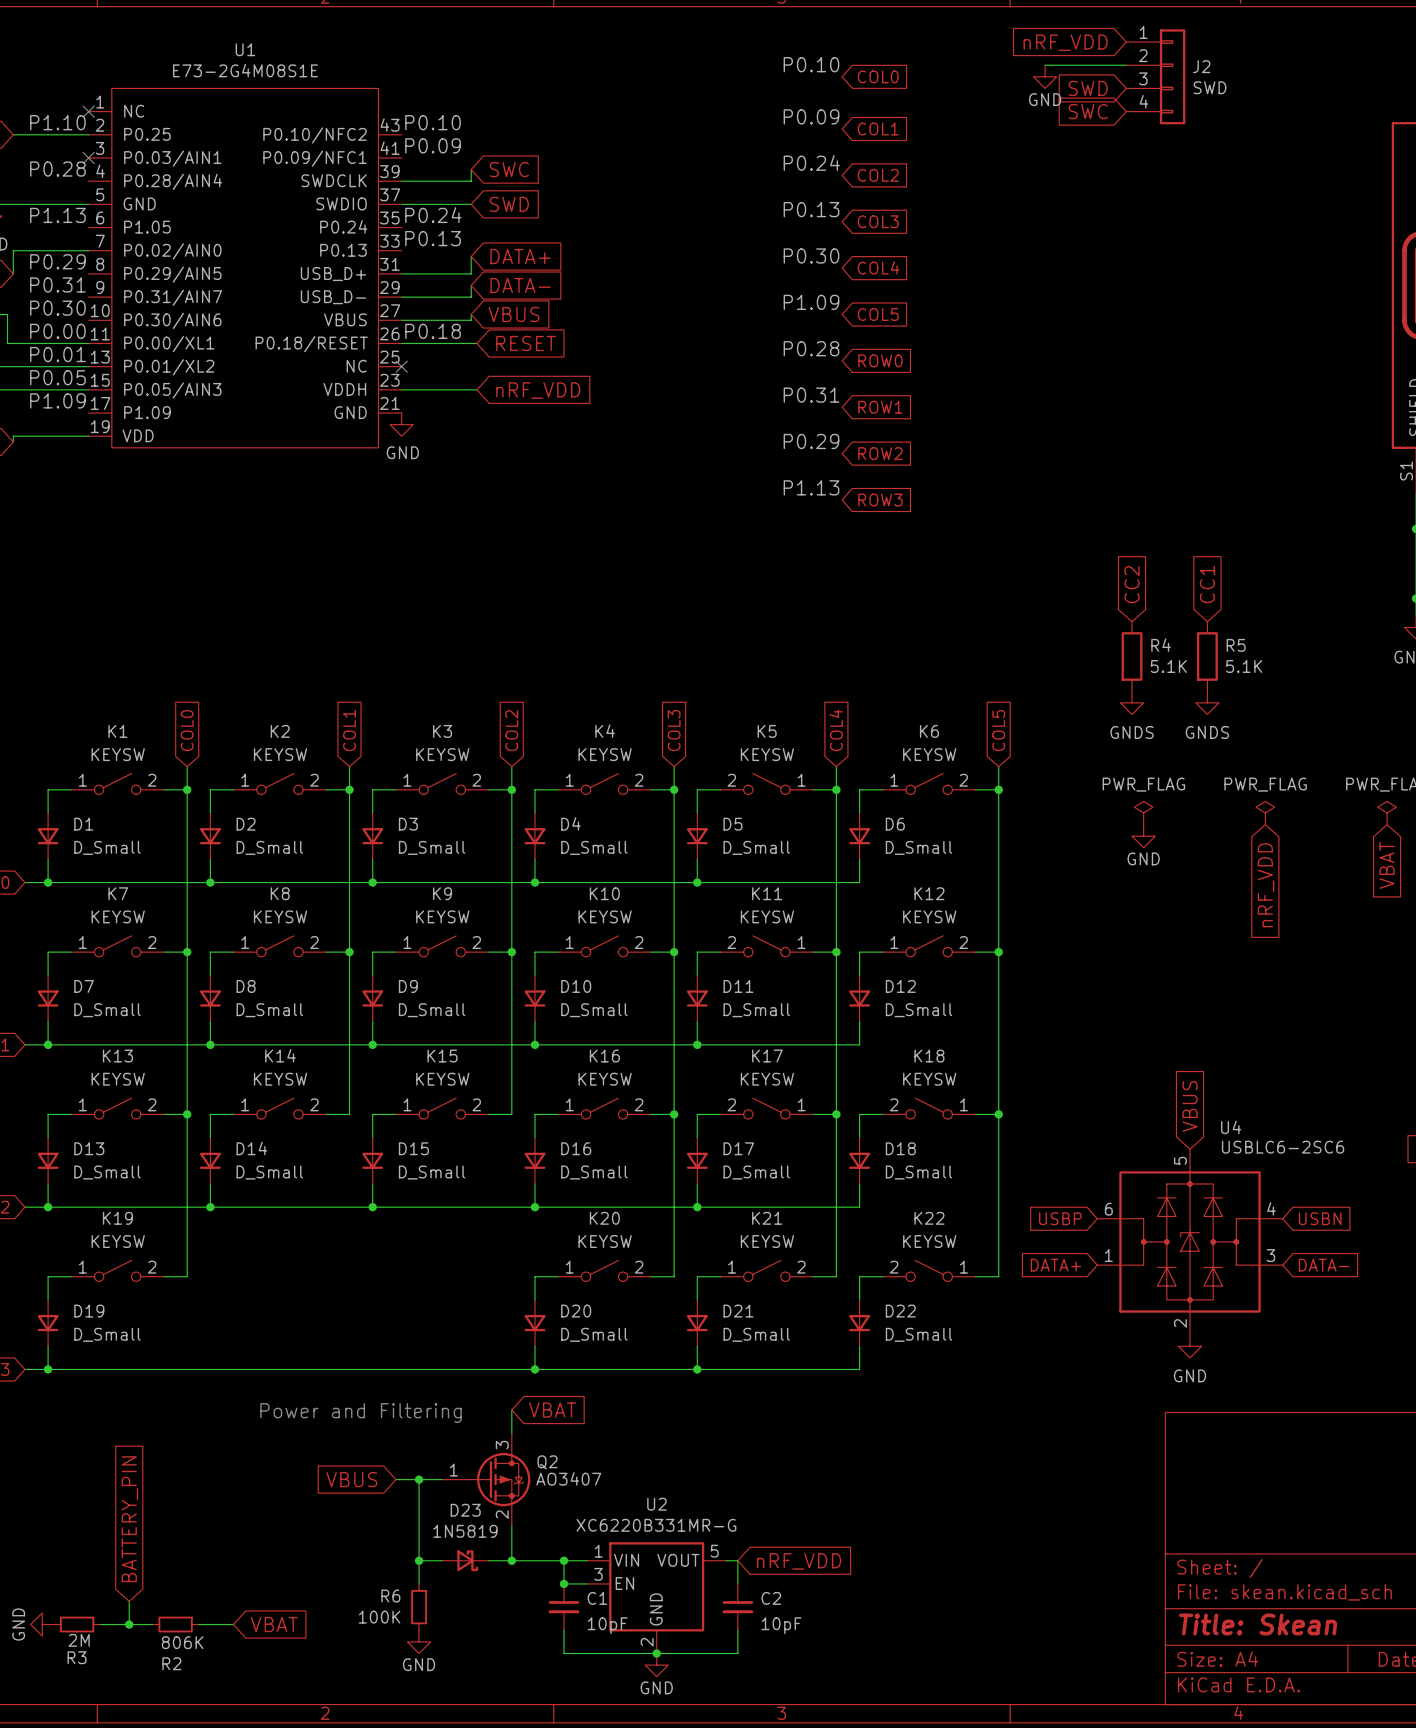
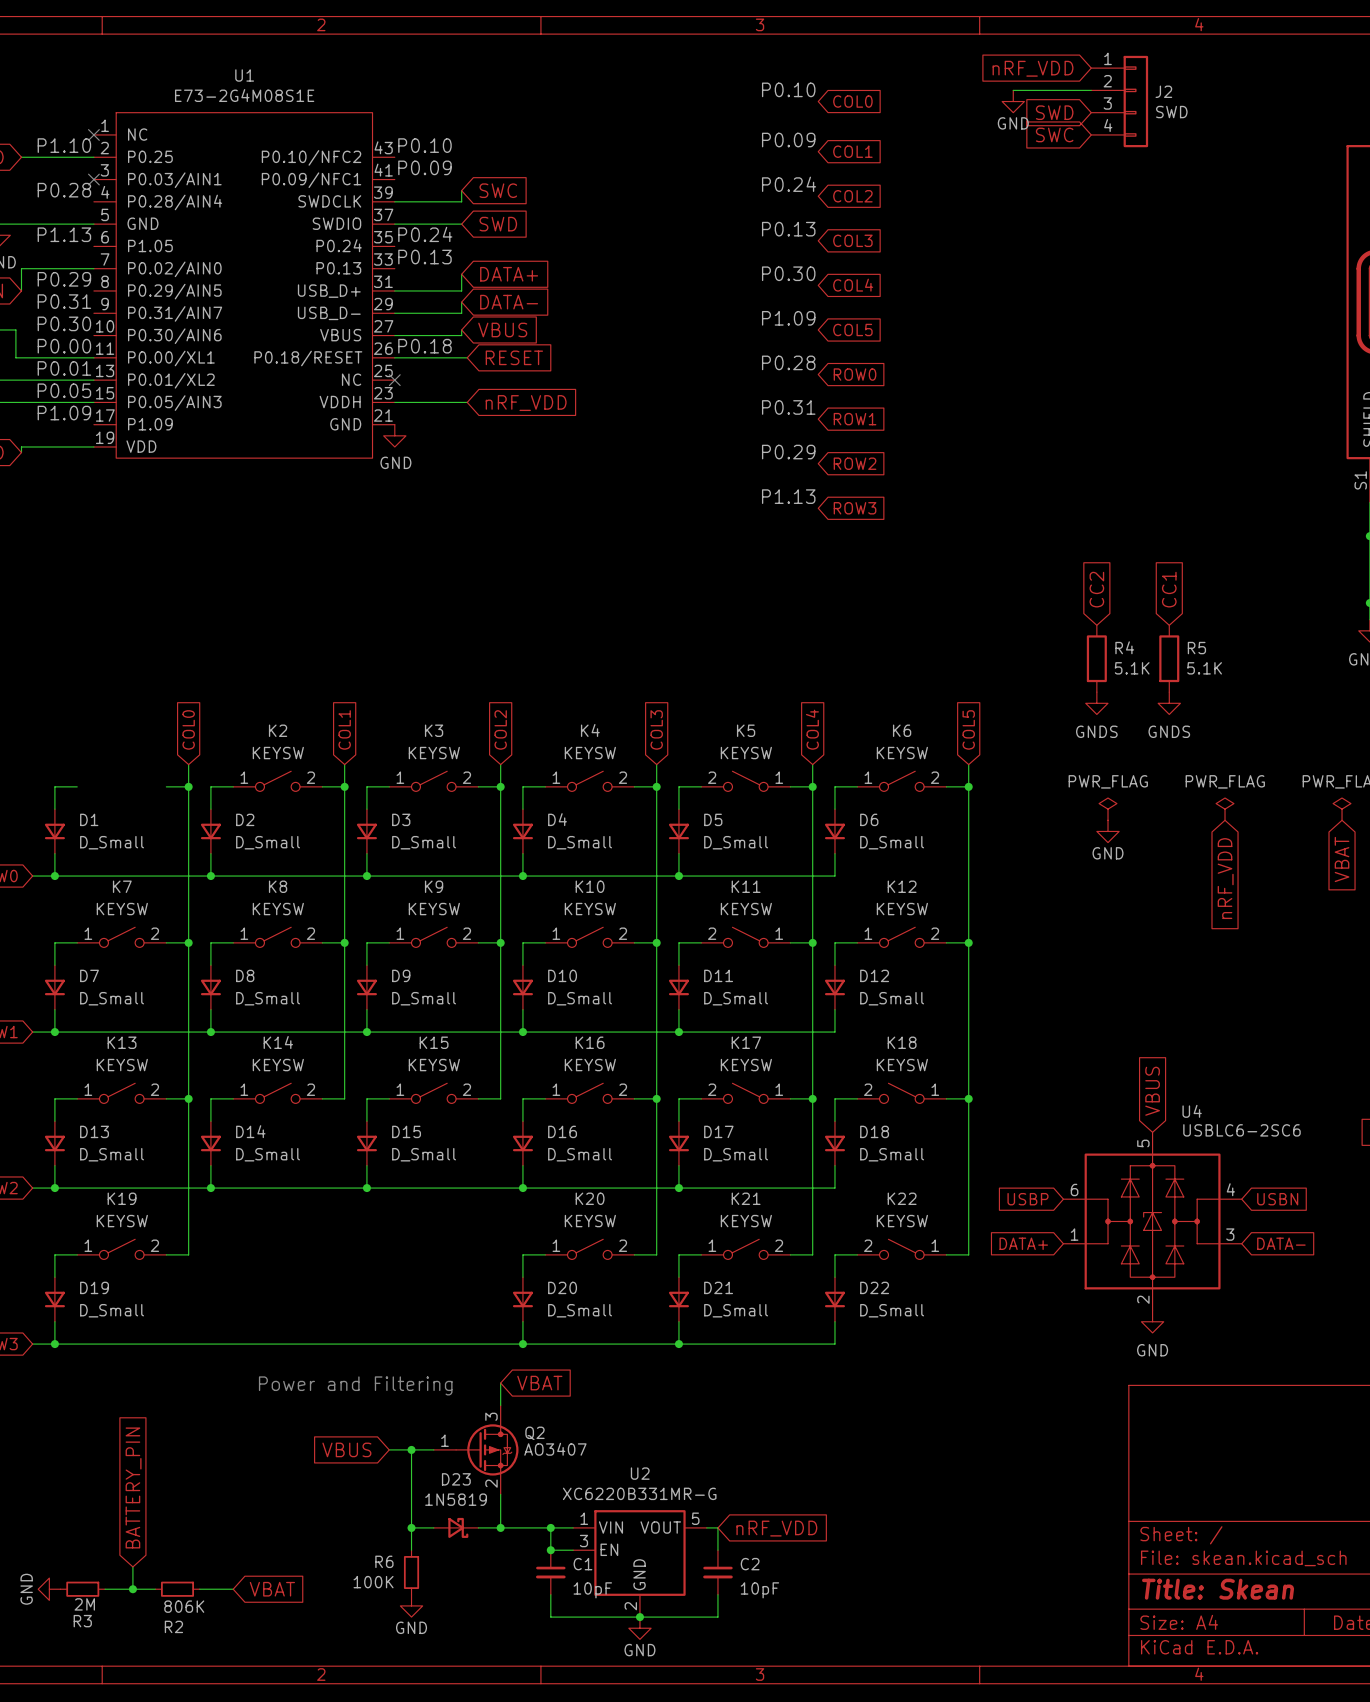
K1: KEYSW (117, 784) -> none

